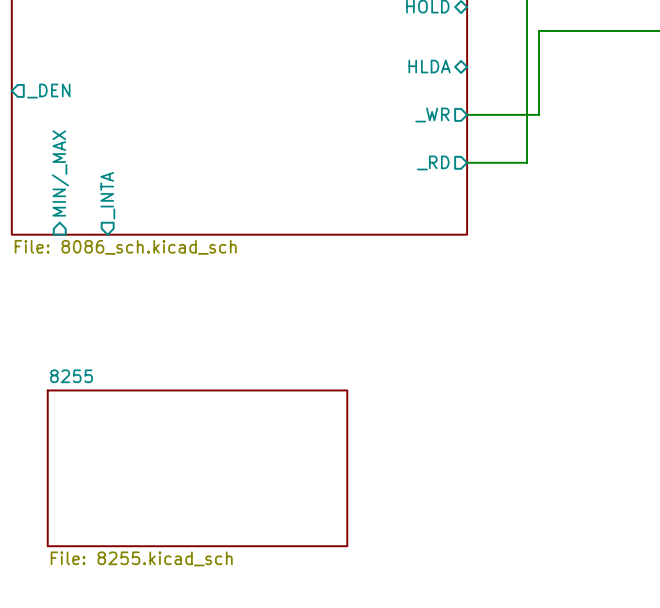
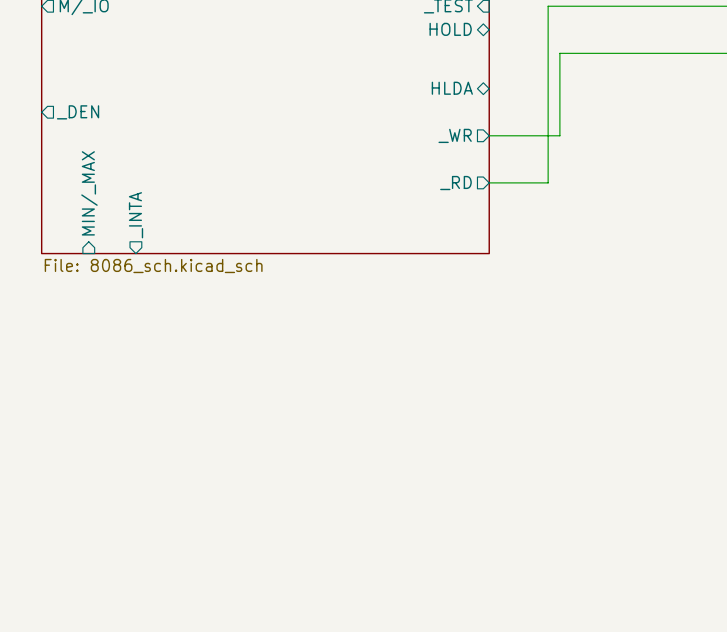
sheet 8255: File: 8255.kicad_sch (197, 468) -> none

